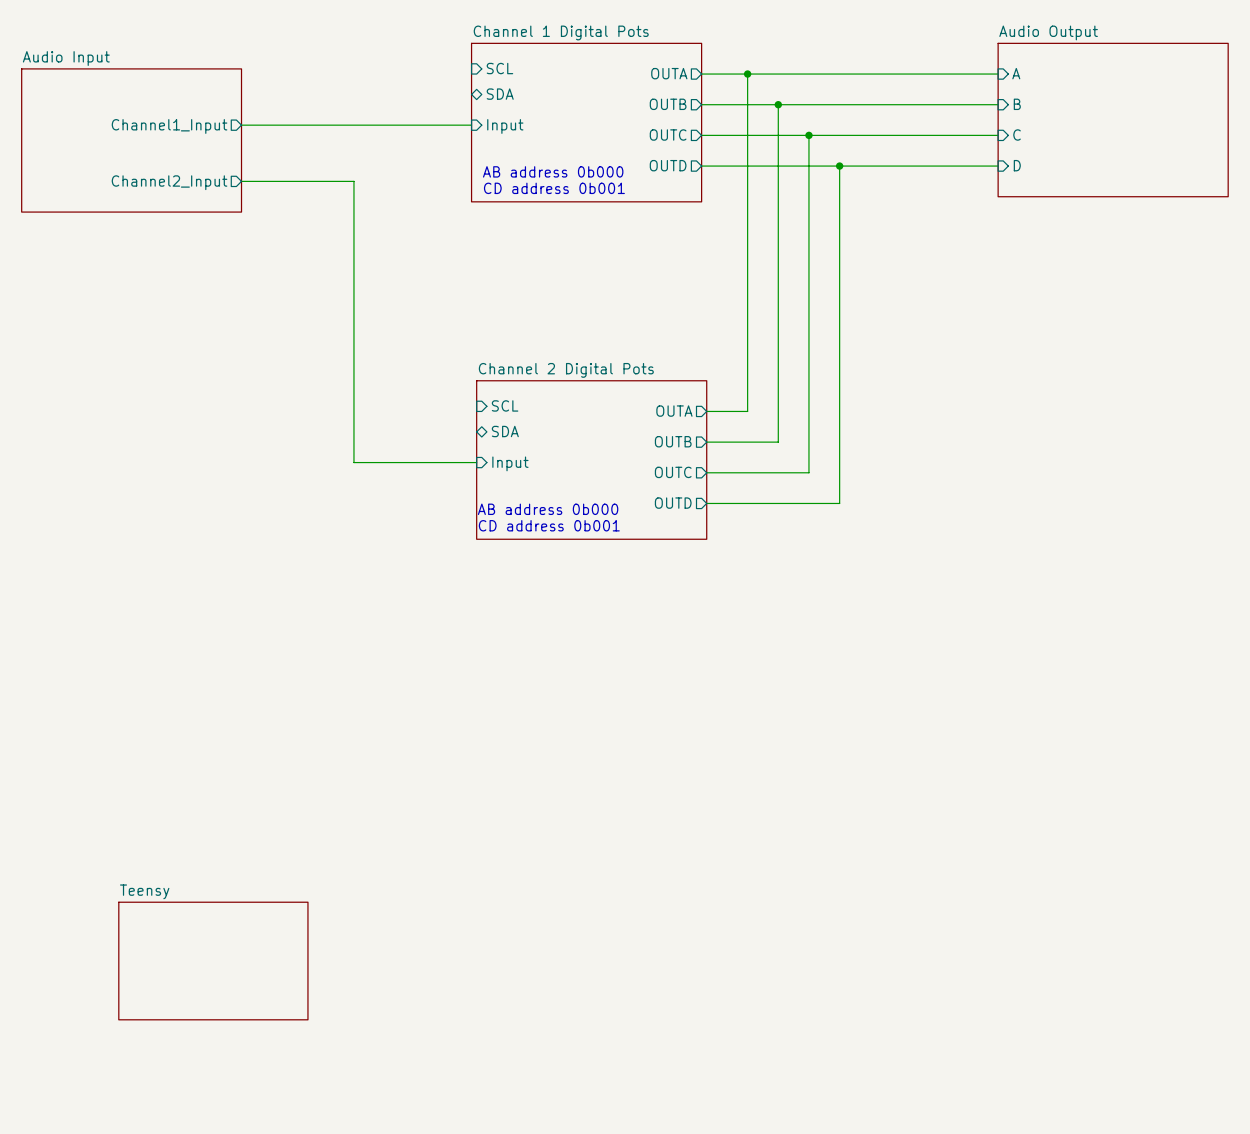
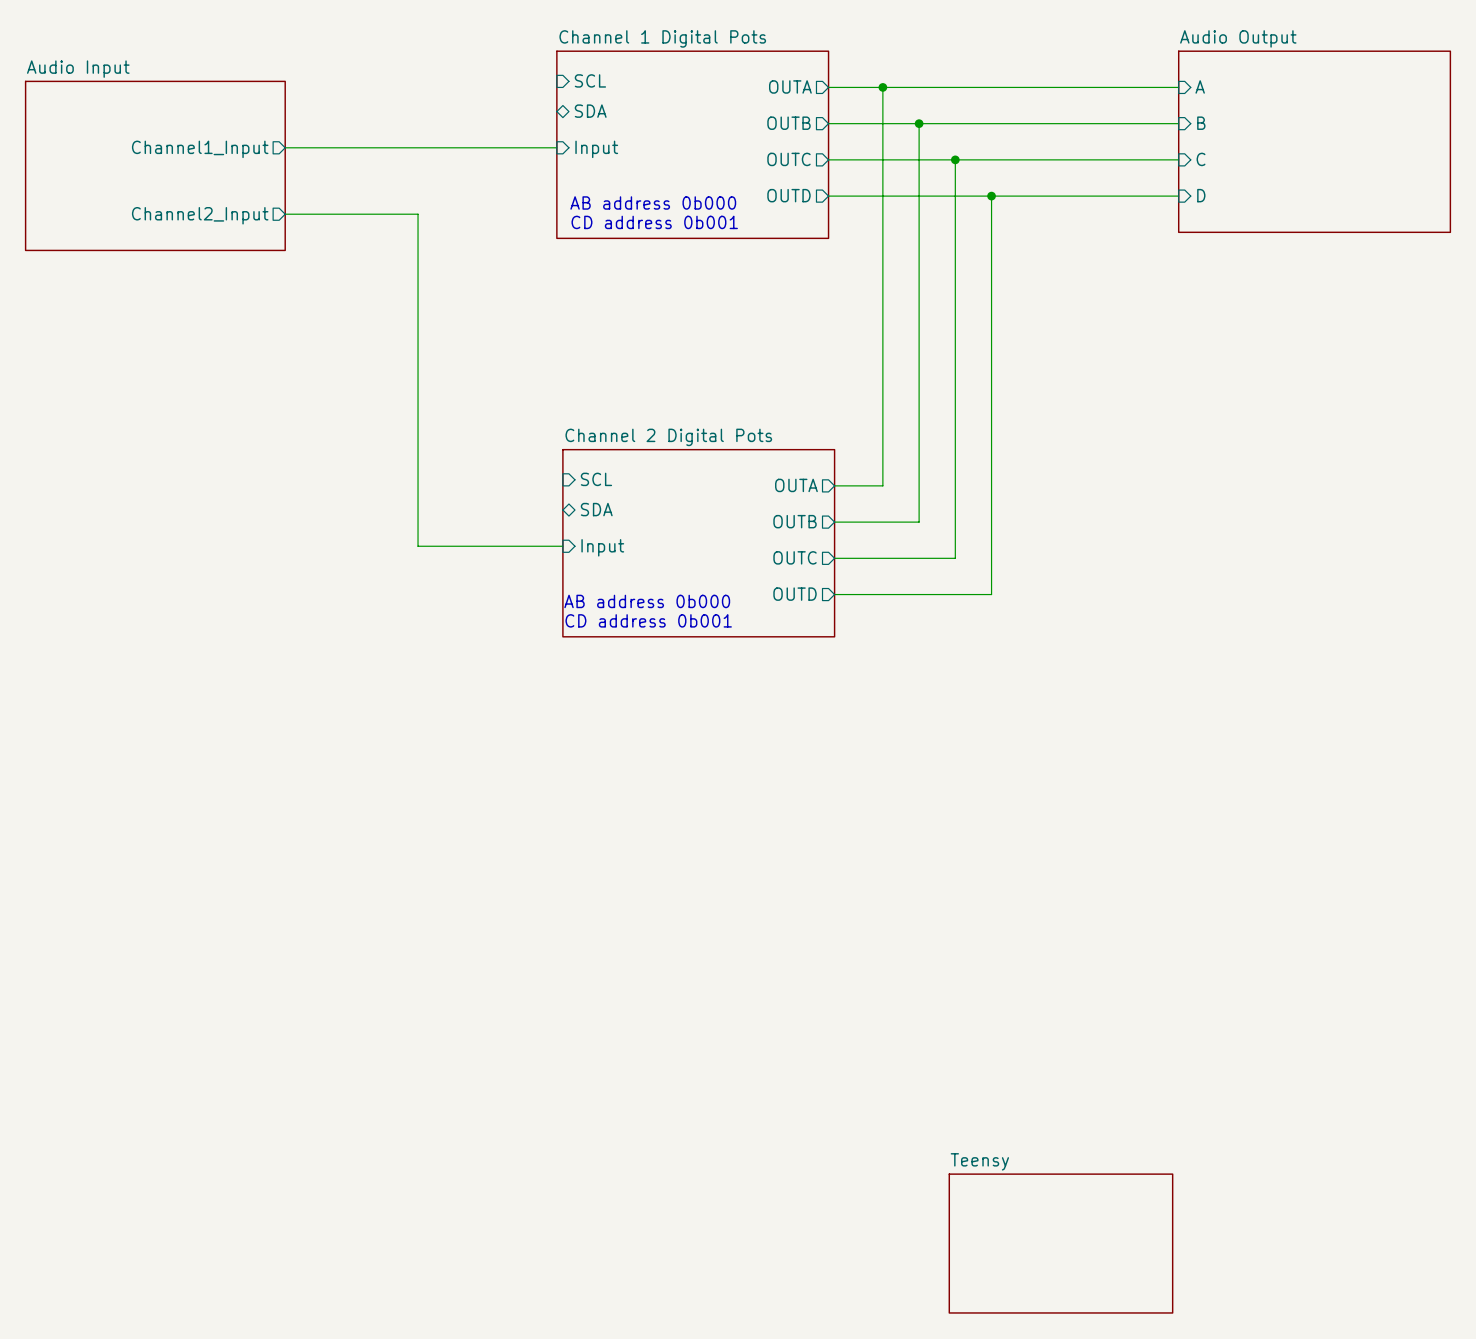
sheet Teensy: (213, 961) -> none
sheet Teensy: none -> (1060, 1243)

